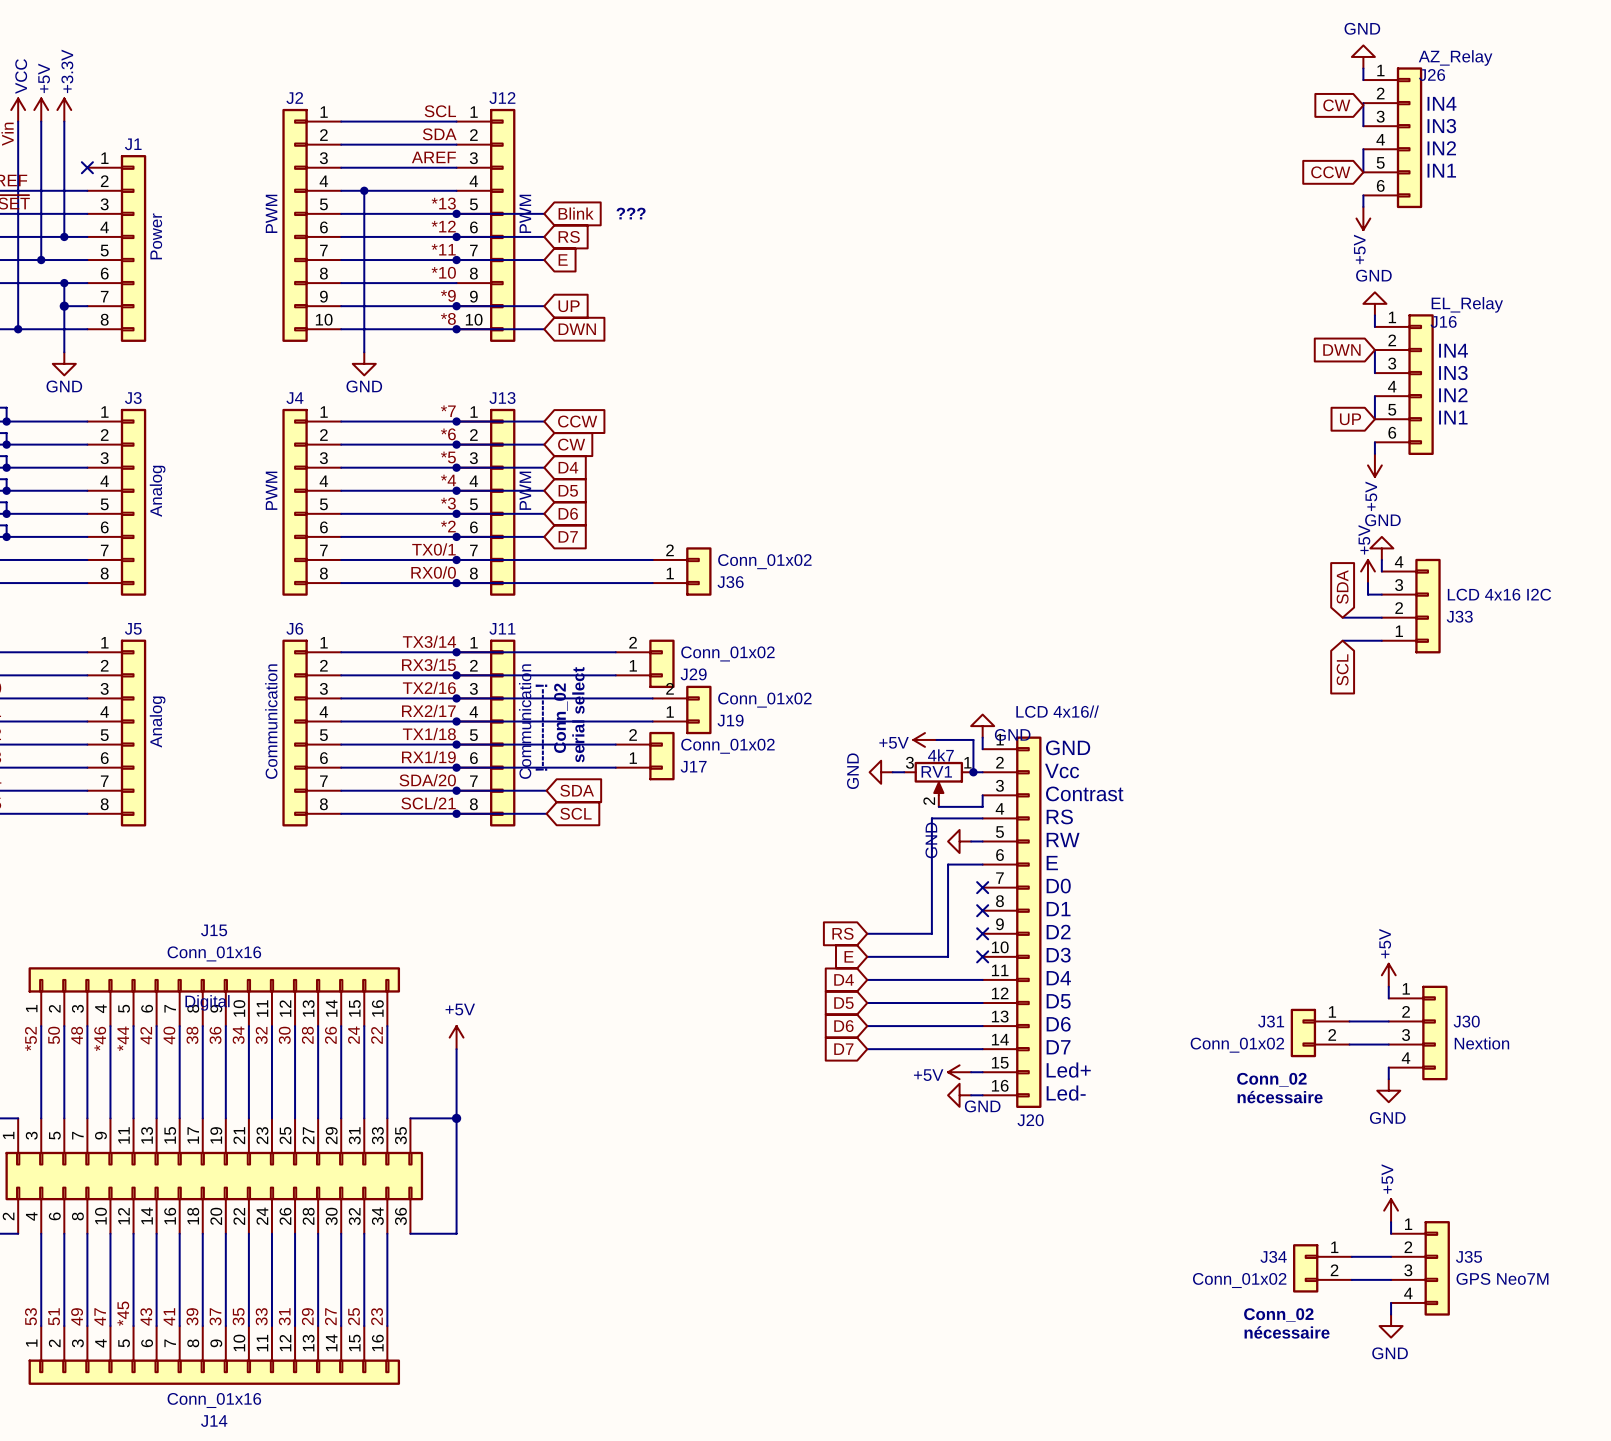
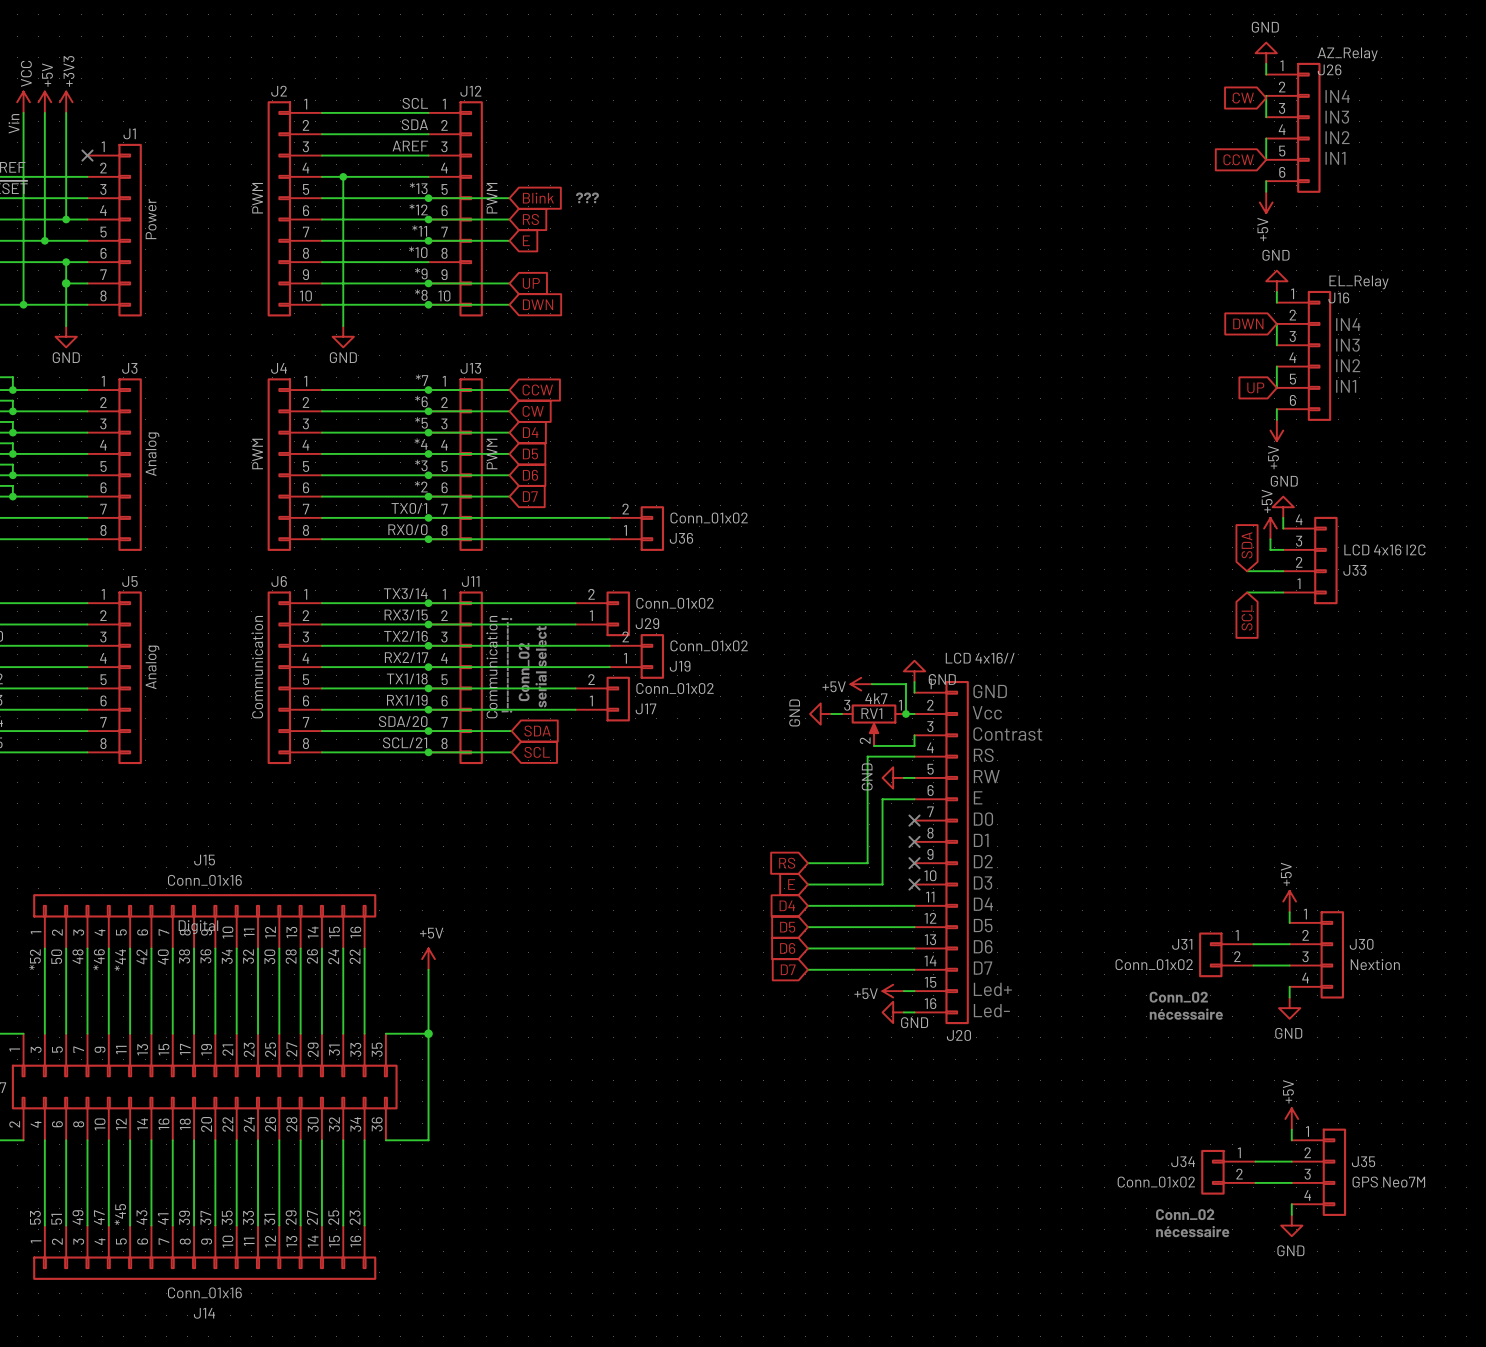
power symbol: +3.3V (64, 110) -> +3V3 (66, 102)

